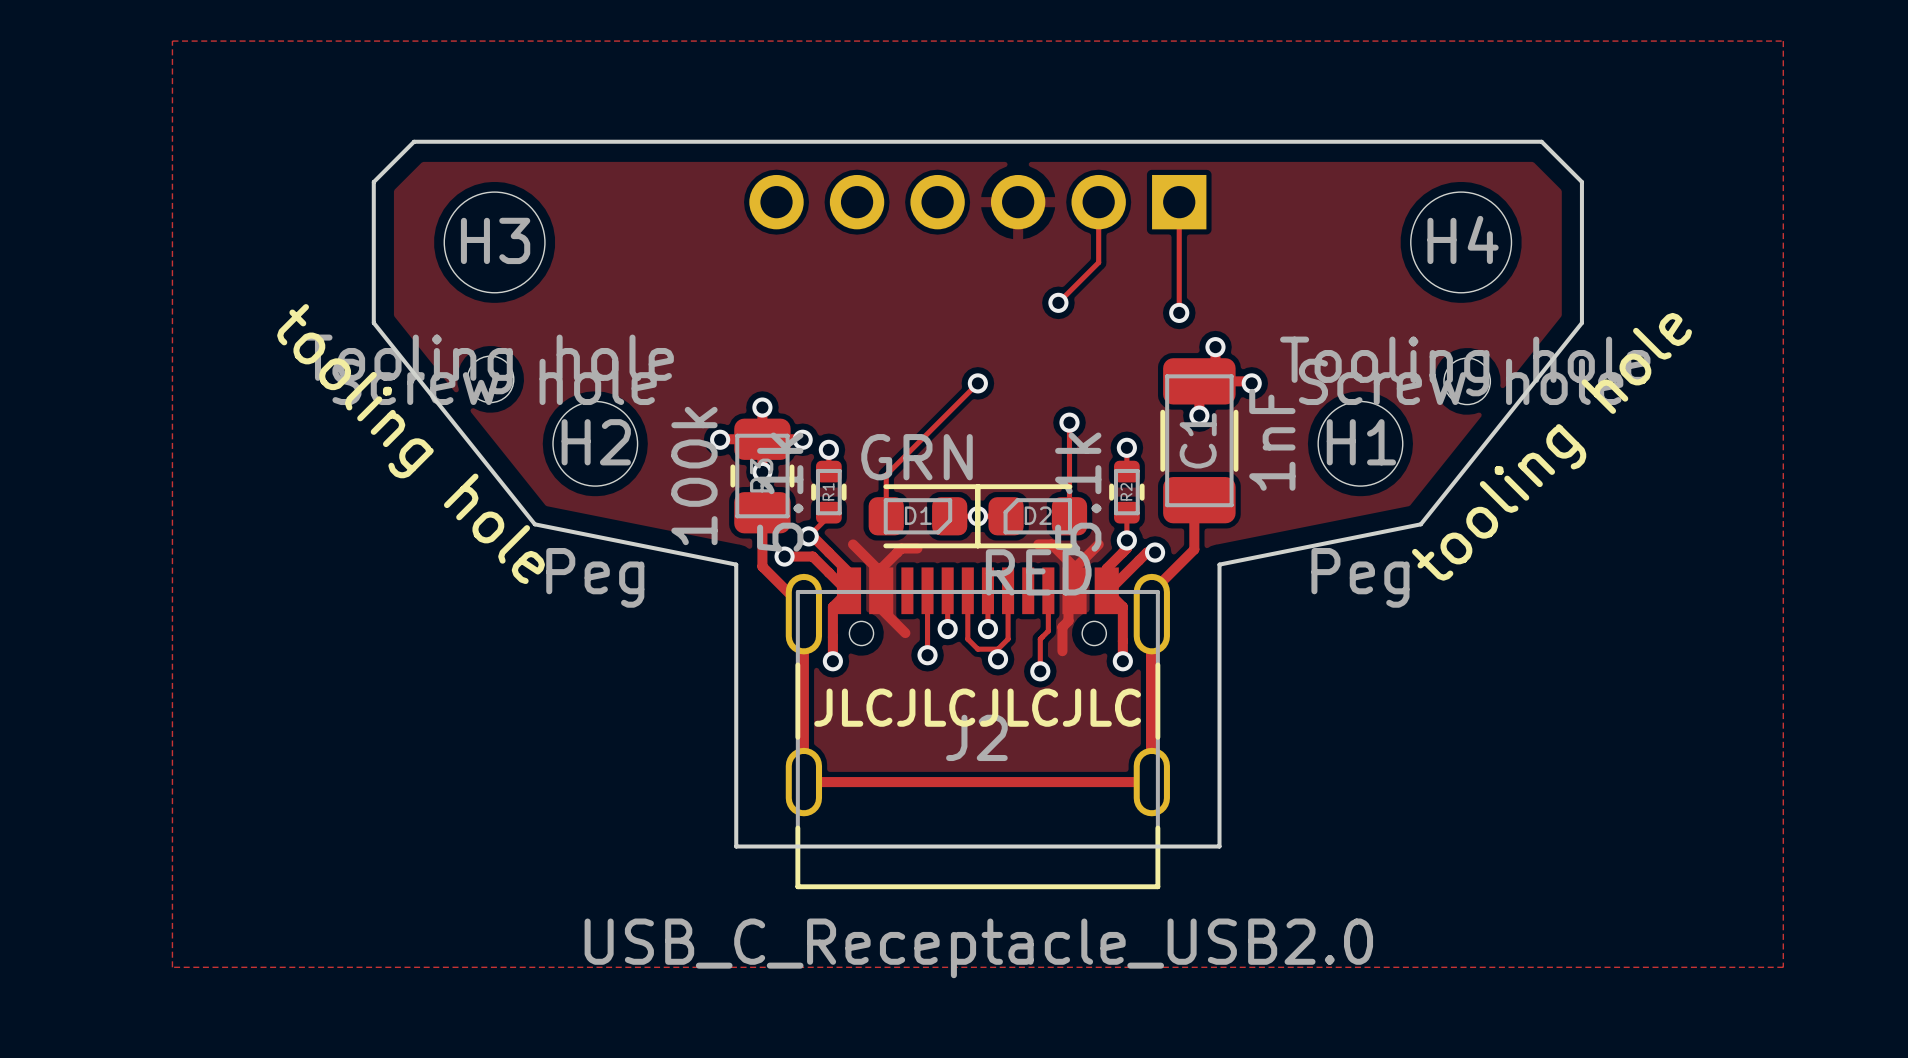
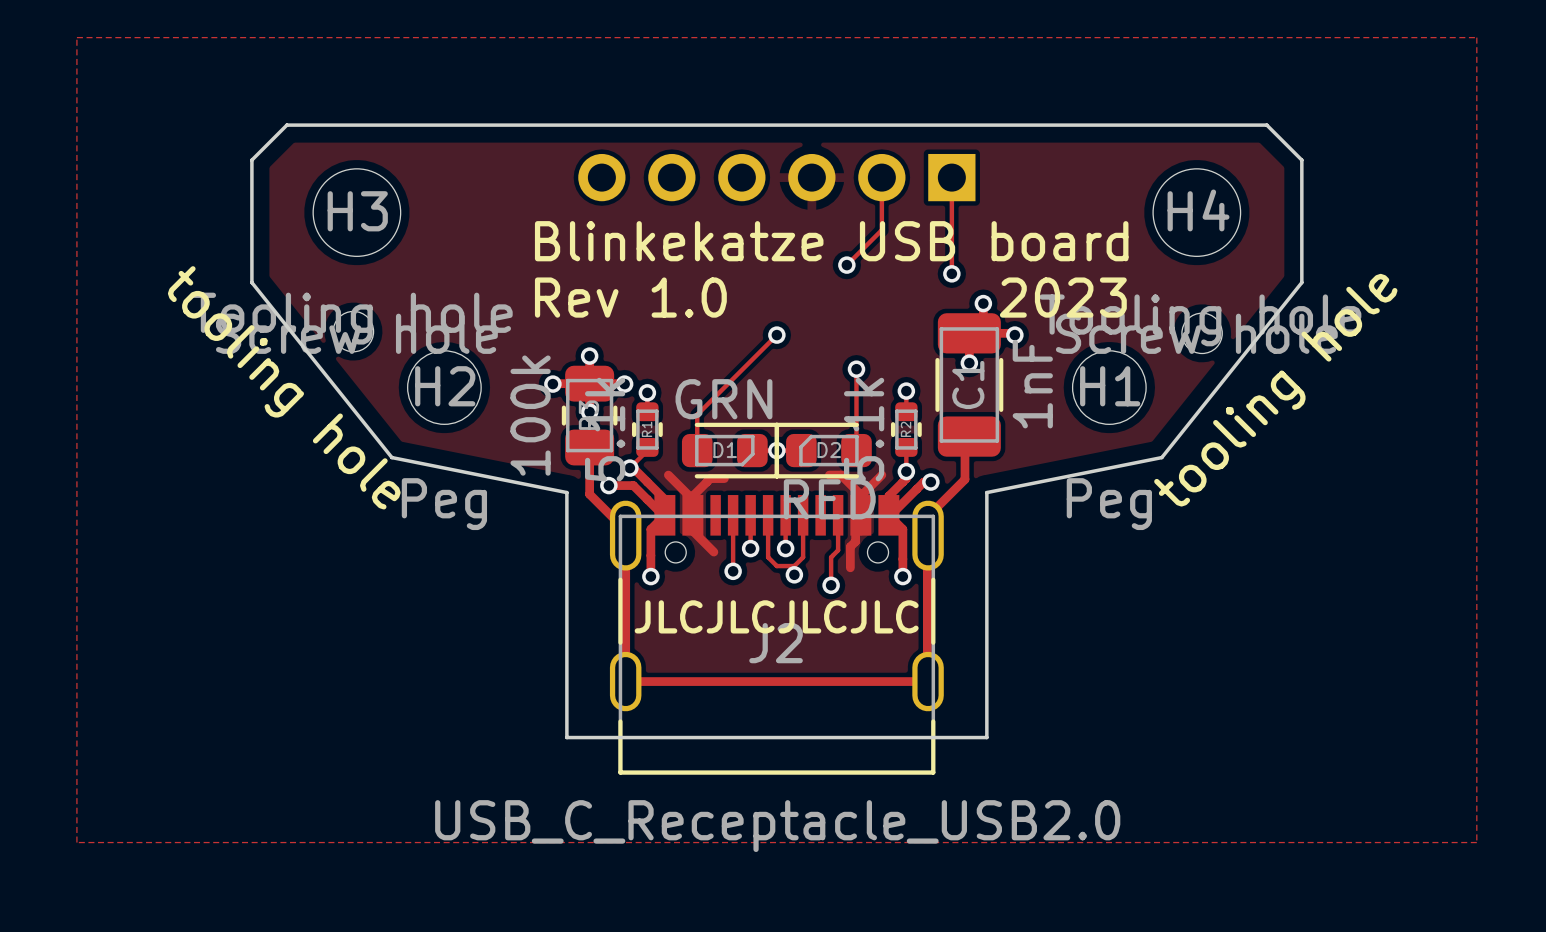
text: none -> Blinkekatze USB board (831, 241)
text: none -> Rev 1.0 2023 (830, 297)

